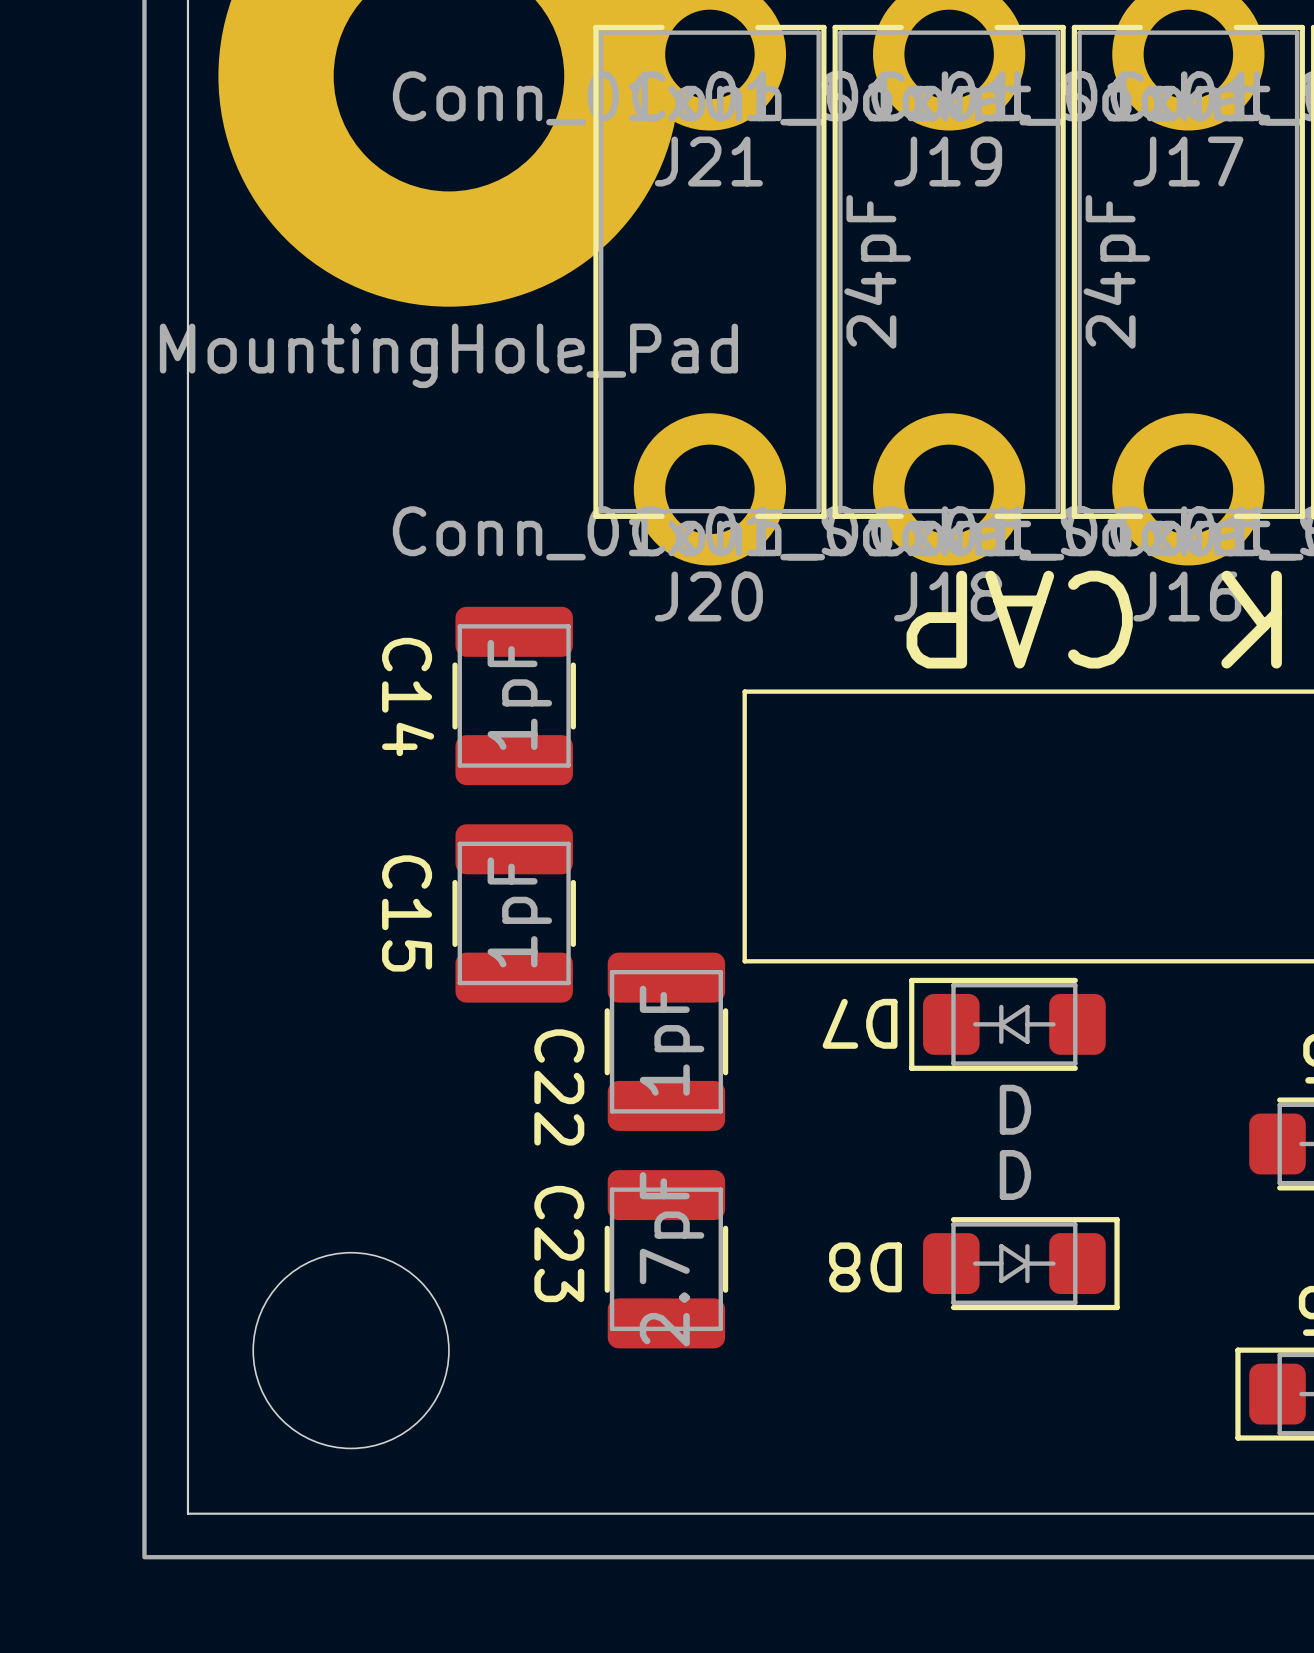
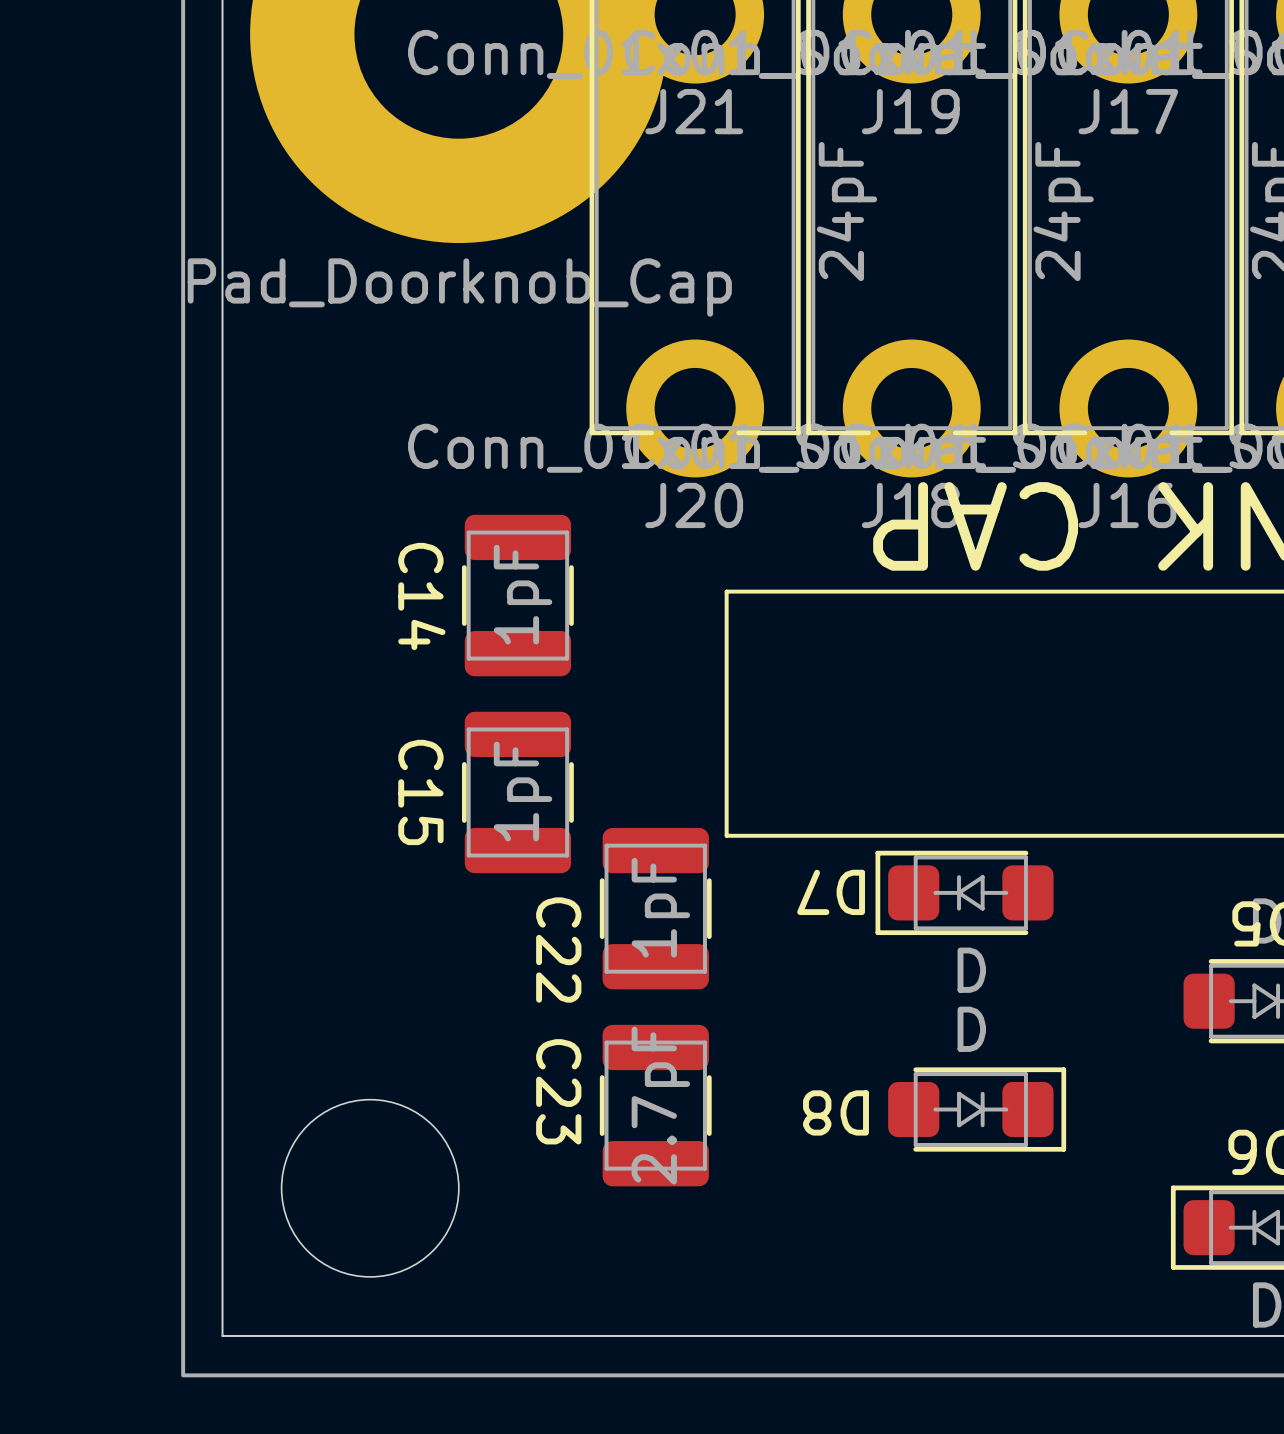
part value: MountingHole_Pad (448, 355) -> Pad_Doorknob_Cap (459, 287)

